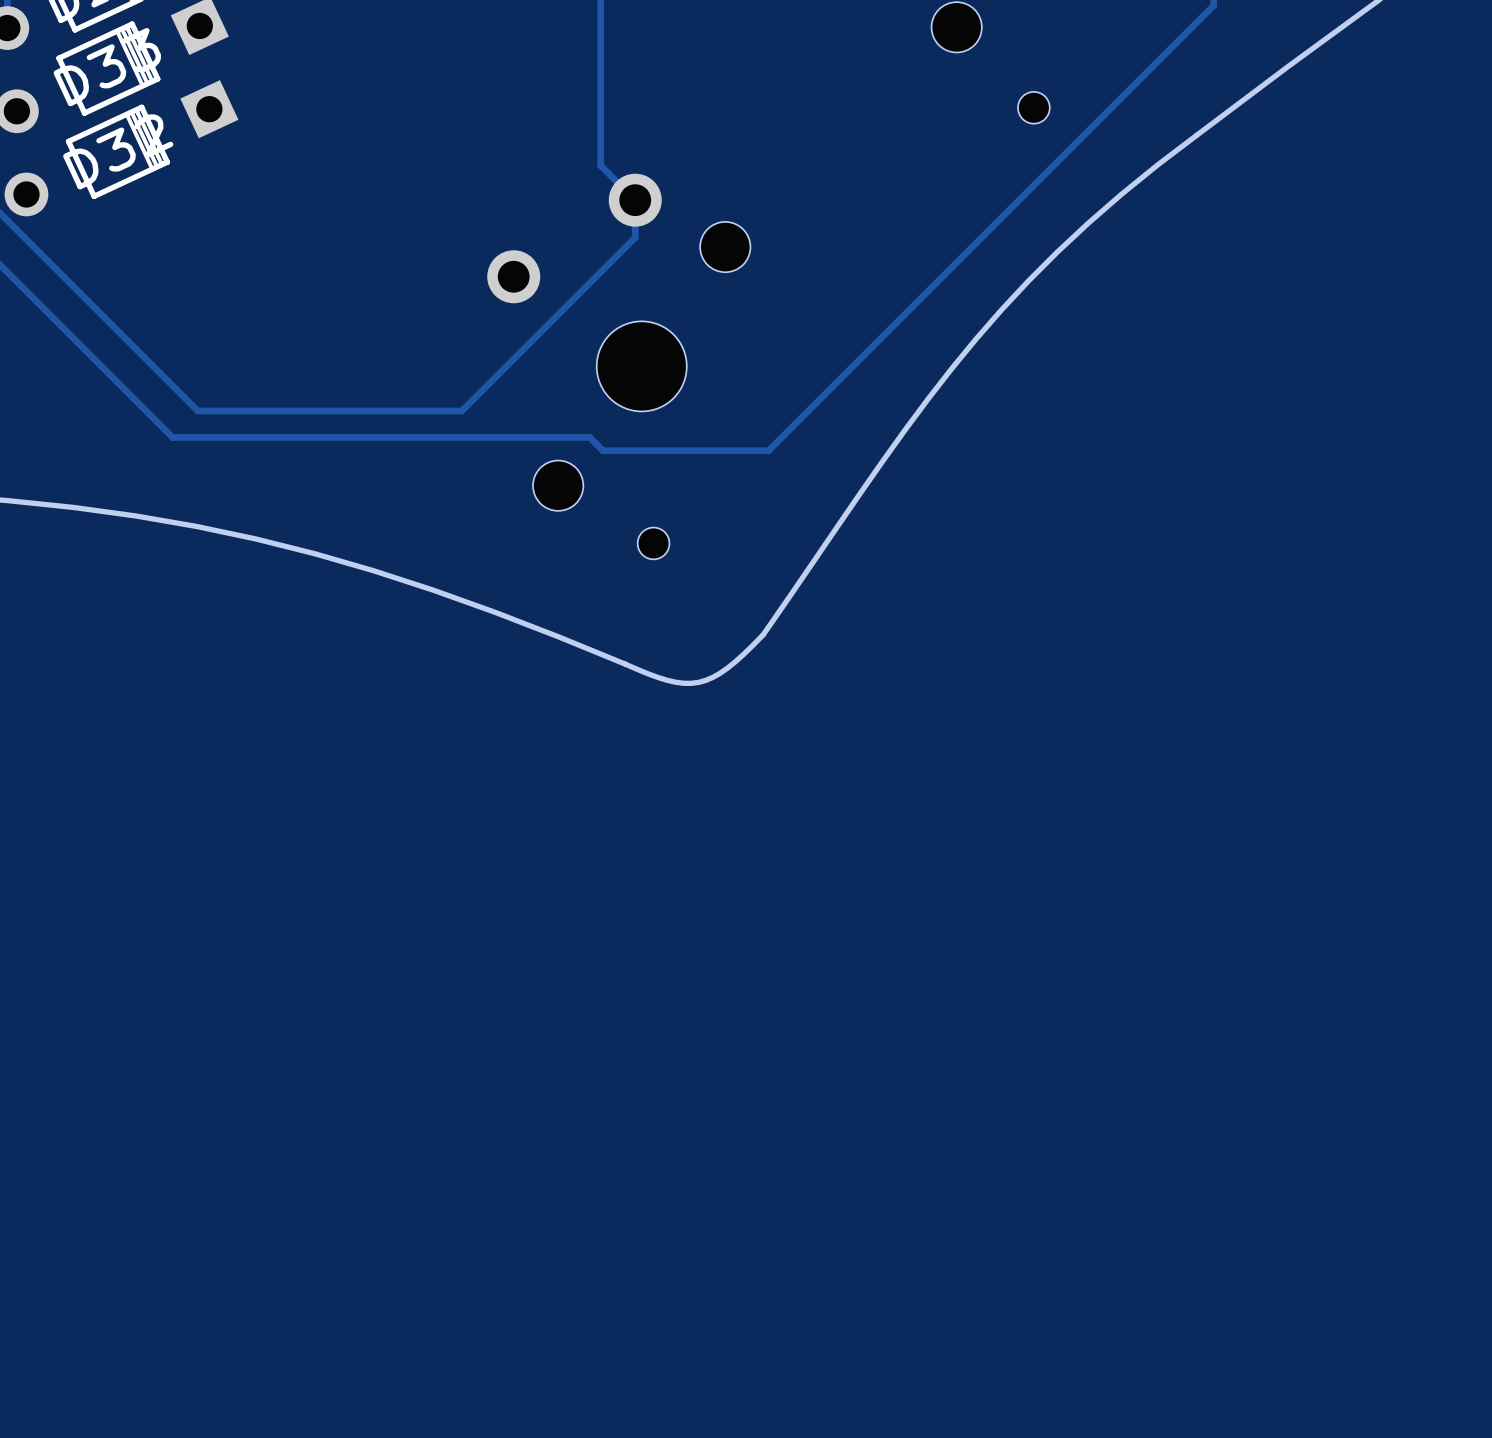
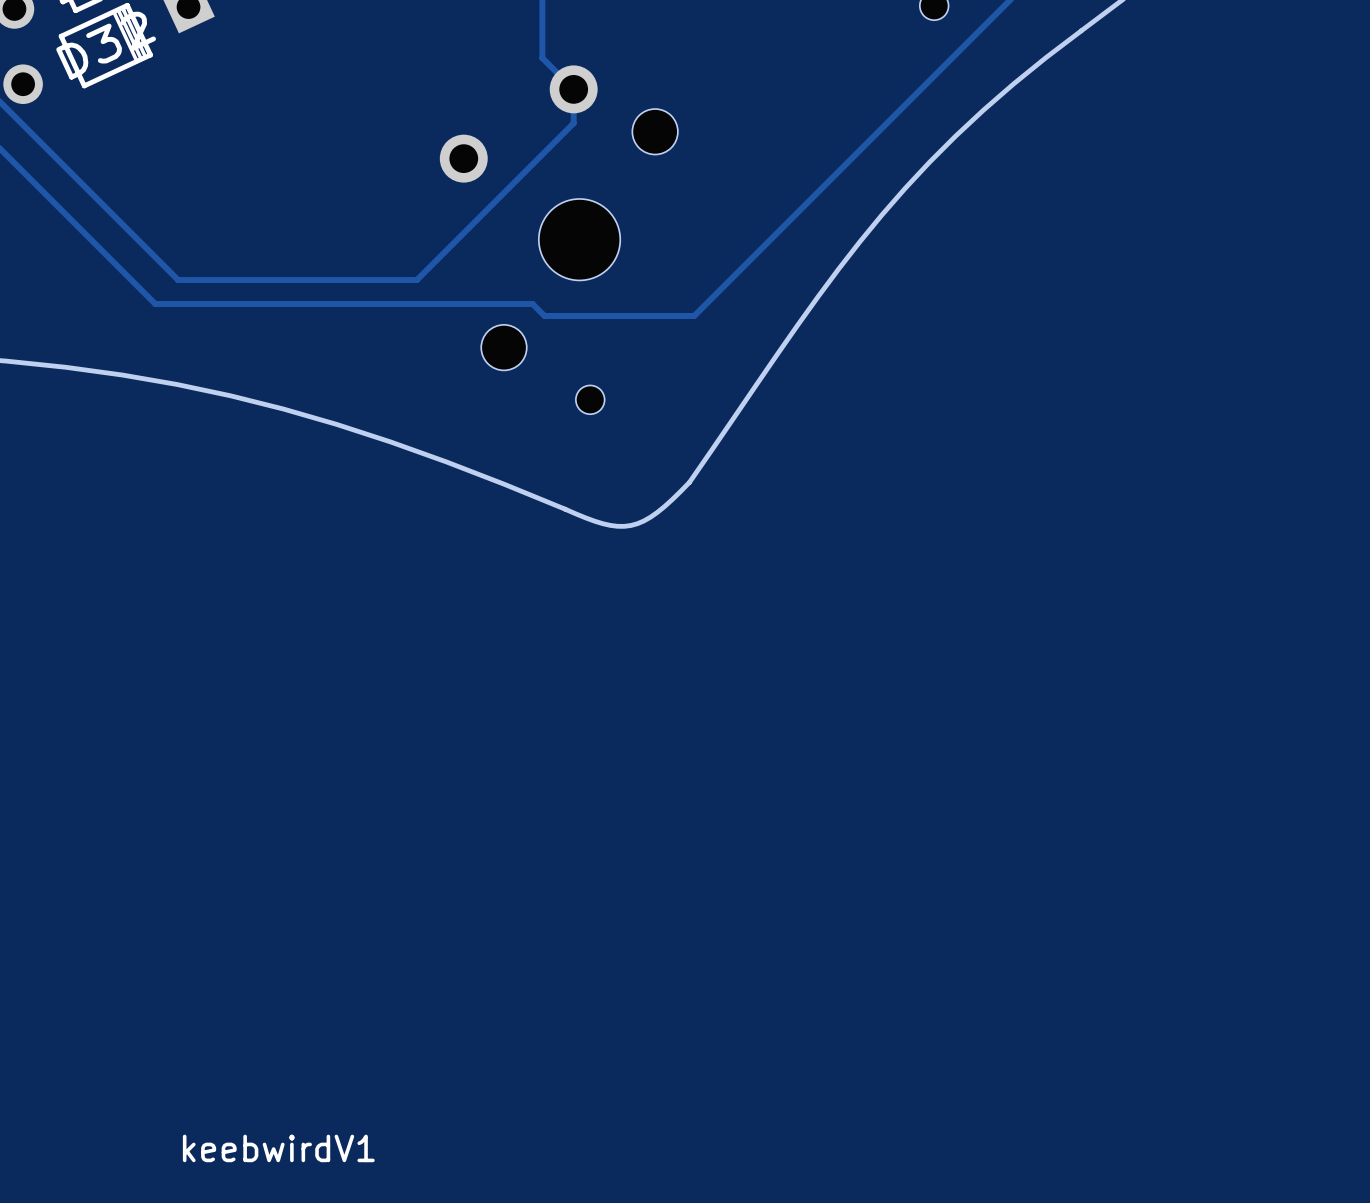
text: none -> keebwirdV1 (278, 1148)

